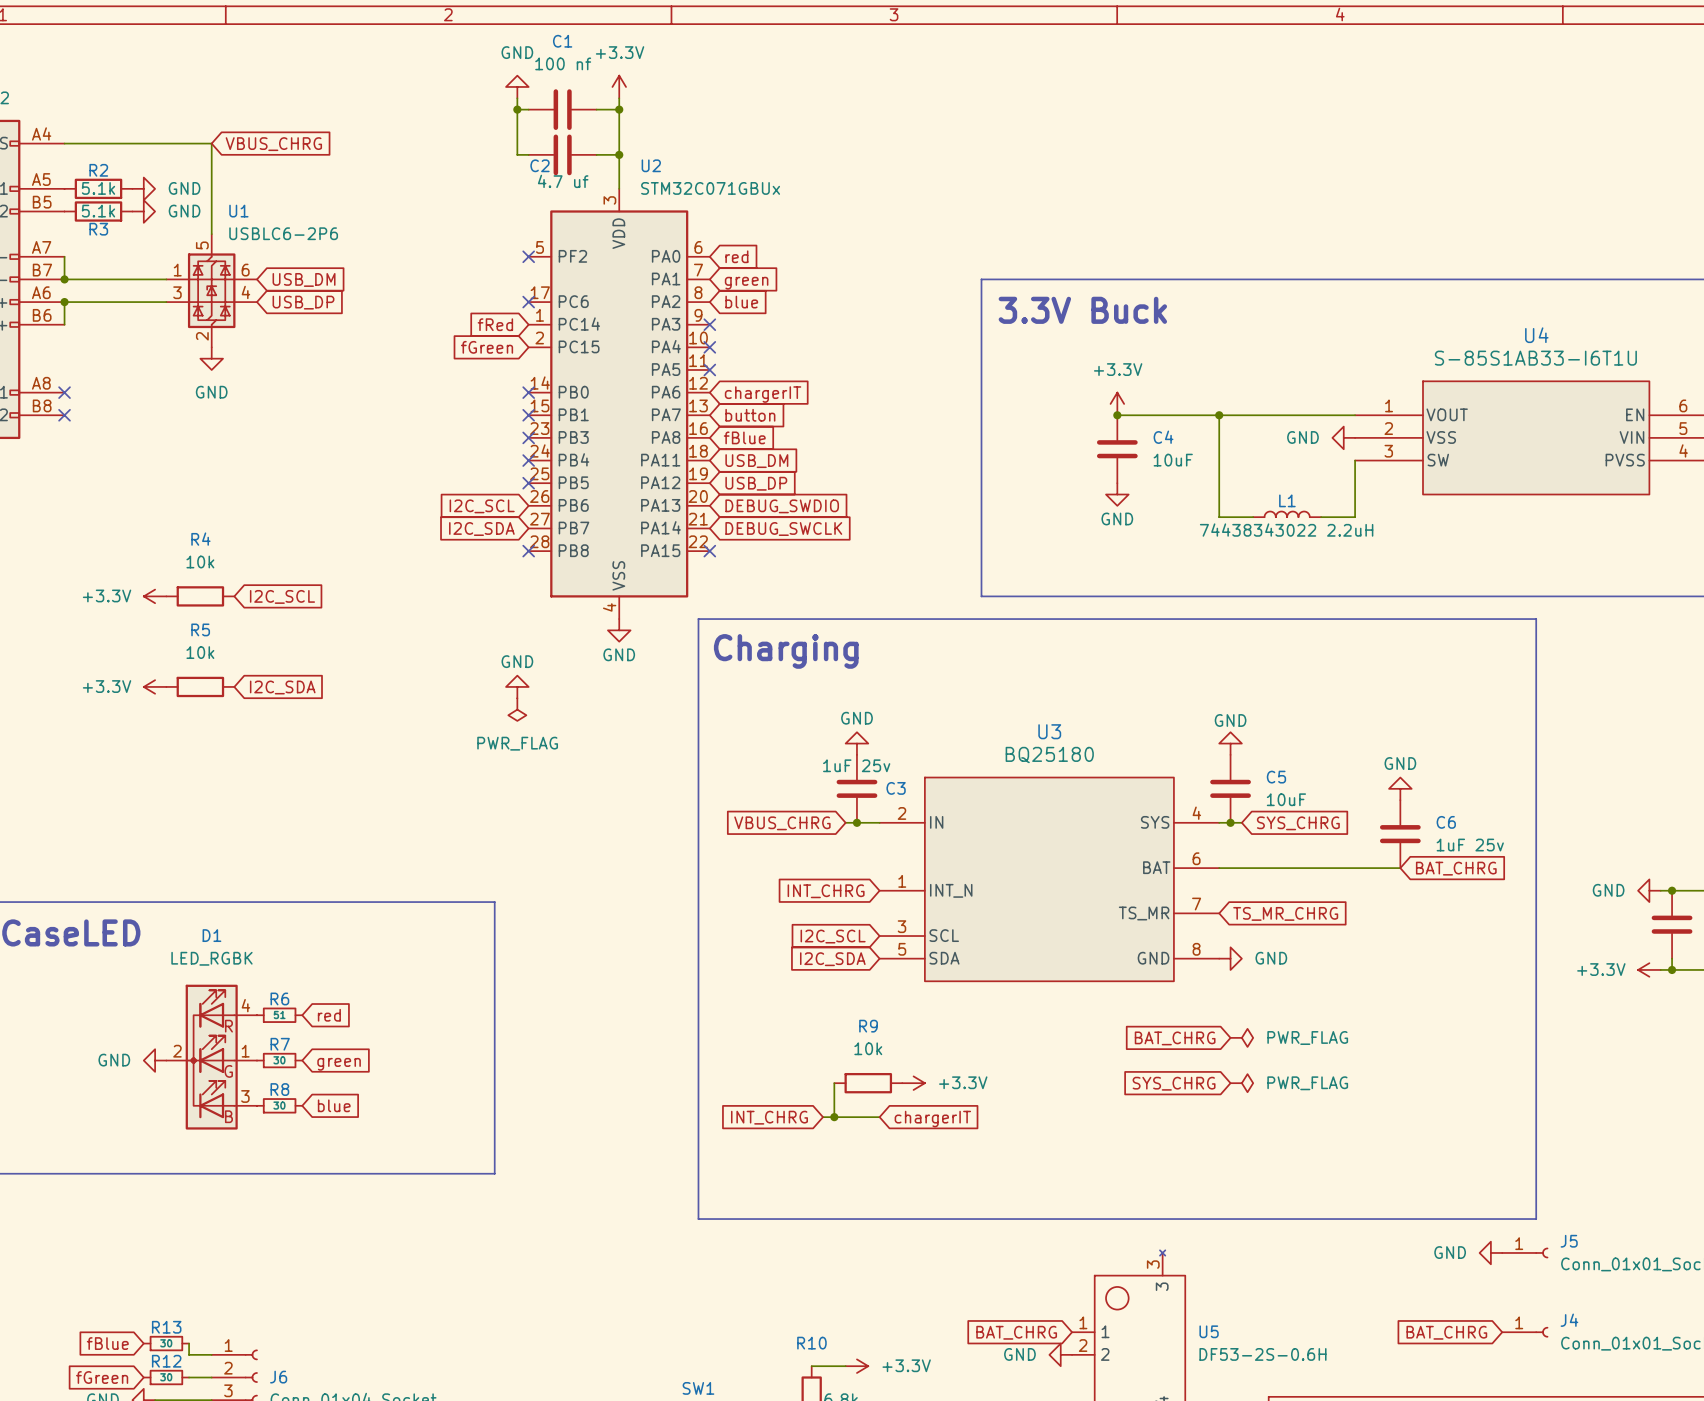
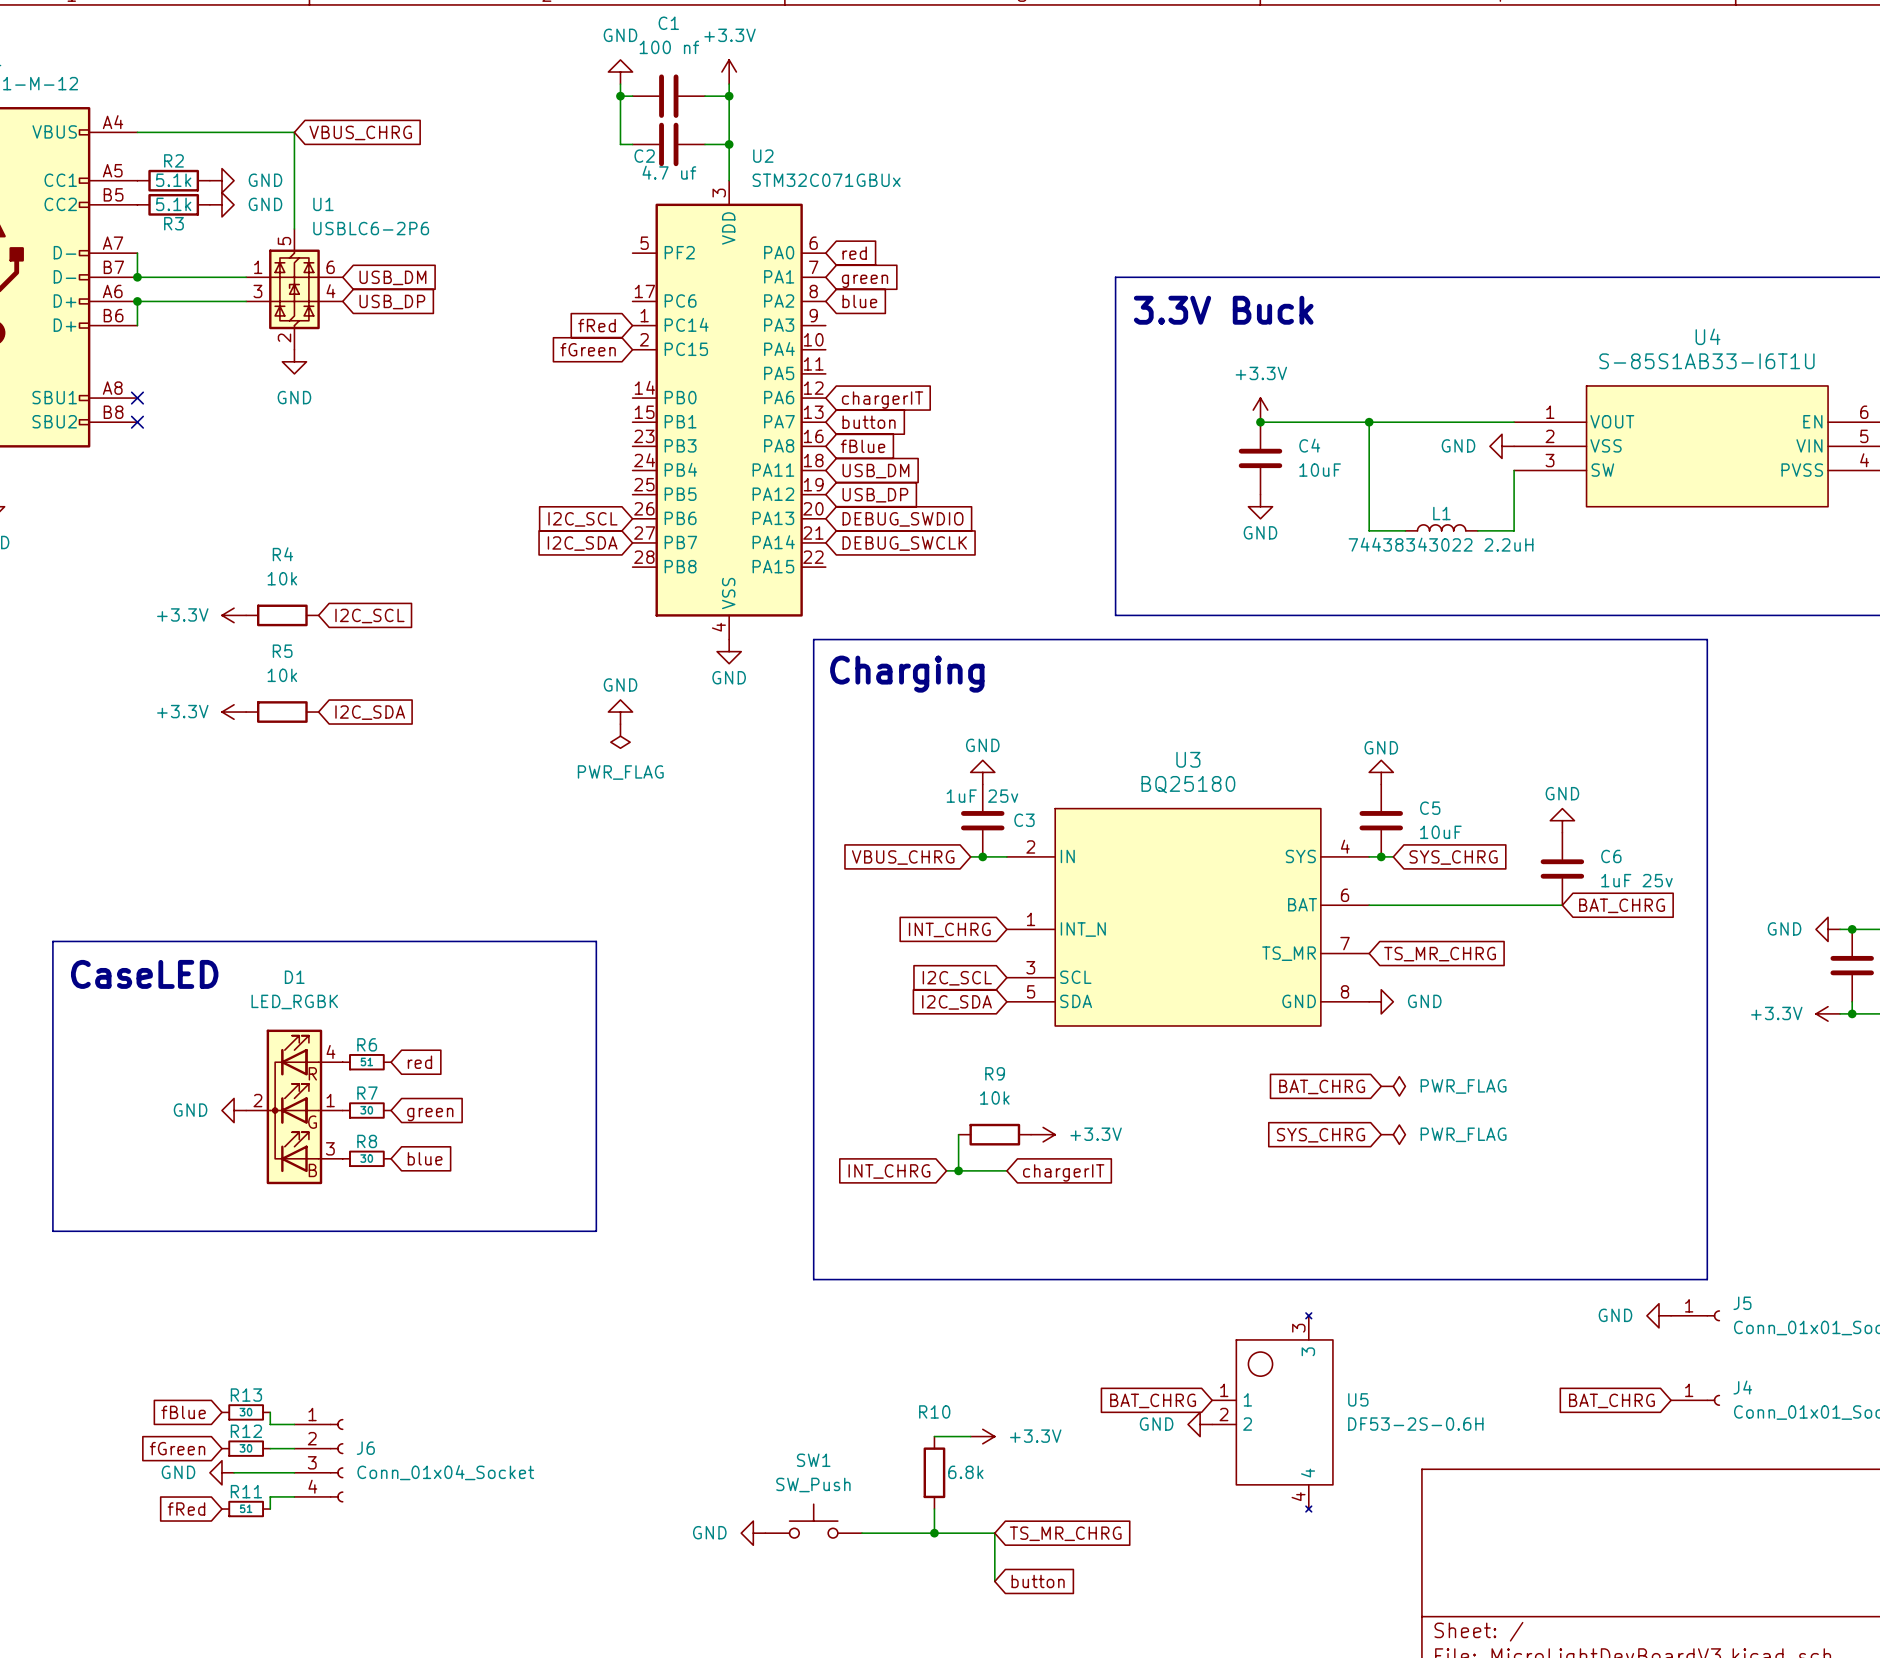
no-connect mark: (528, 256) -> none
no-connect mark: (528, 302) -> none
no-connect mark: (709, 324) -> none
no-connect mark: (709, 347) -> none
no-connect mark: (709, 369) -> none
no-connect mark: (528, 392) -> none
no-connect mark: (528, 415) -> none
no-connect mark: (528, 437) -> none
no-connect mark: (528, 460) -> none
no-connect mark: (528, 483) -> none
no-connect mark: (528, 551) -> none
no-connect mark: (709, 551) -> none

